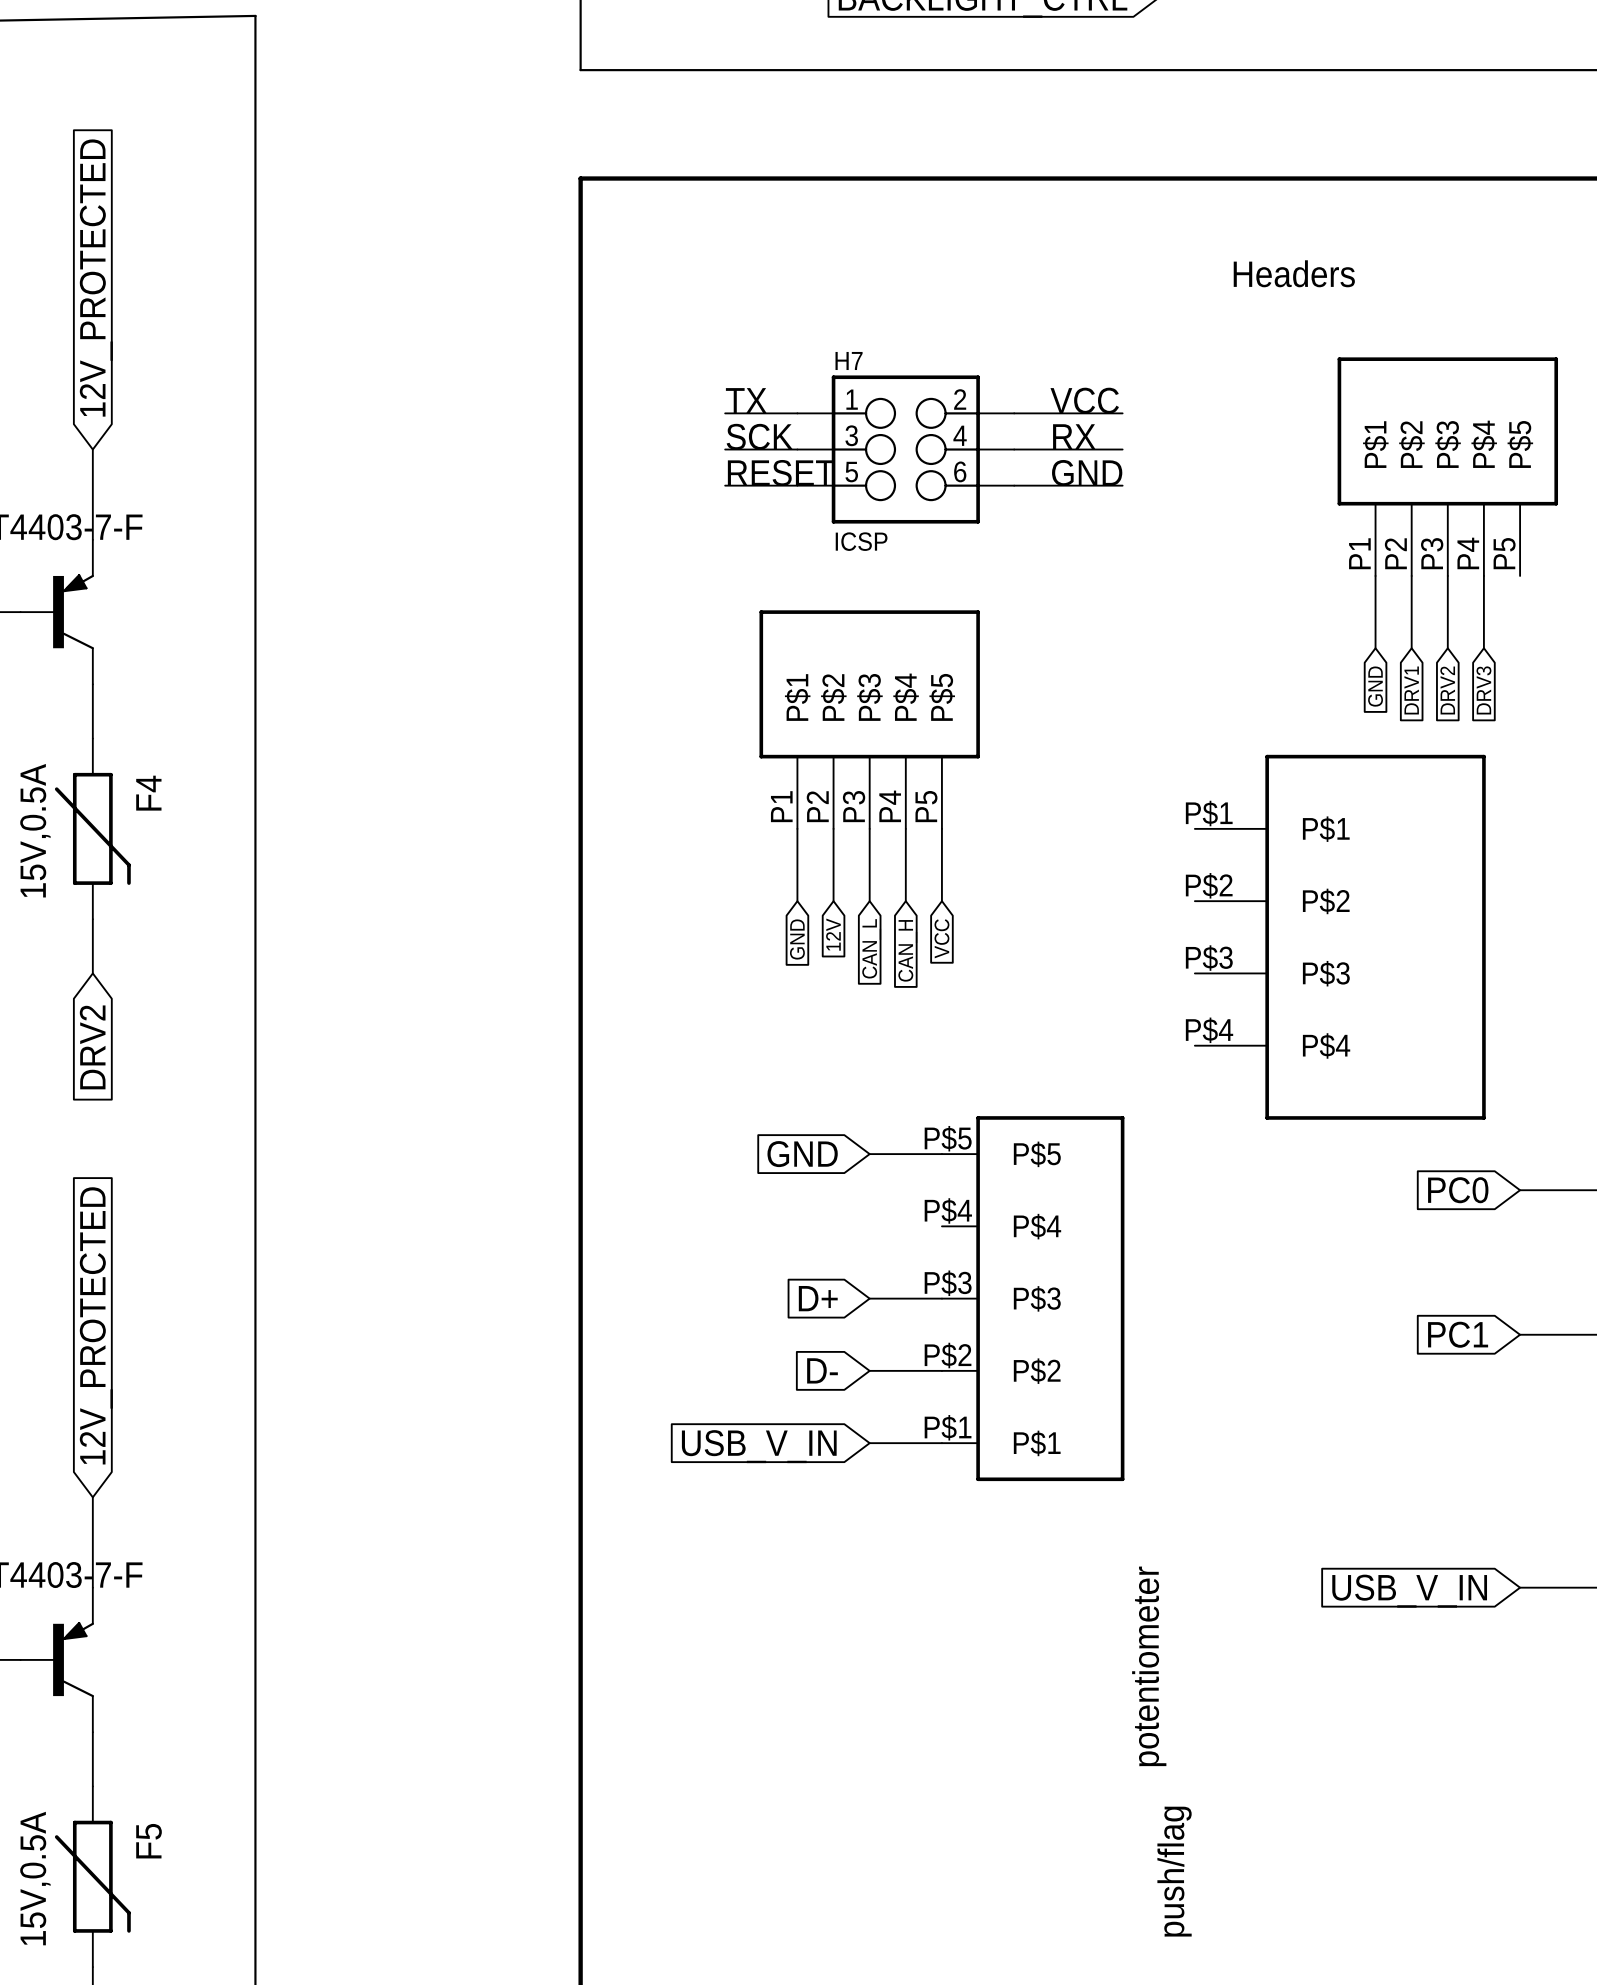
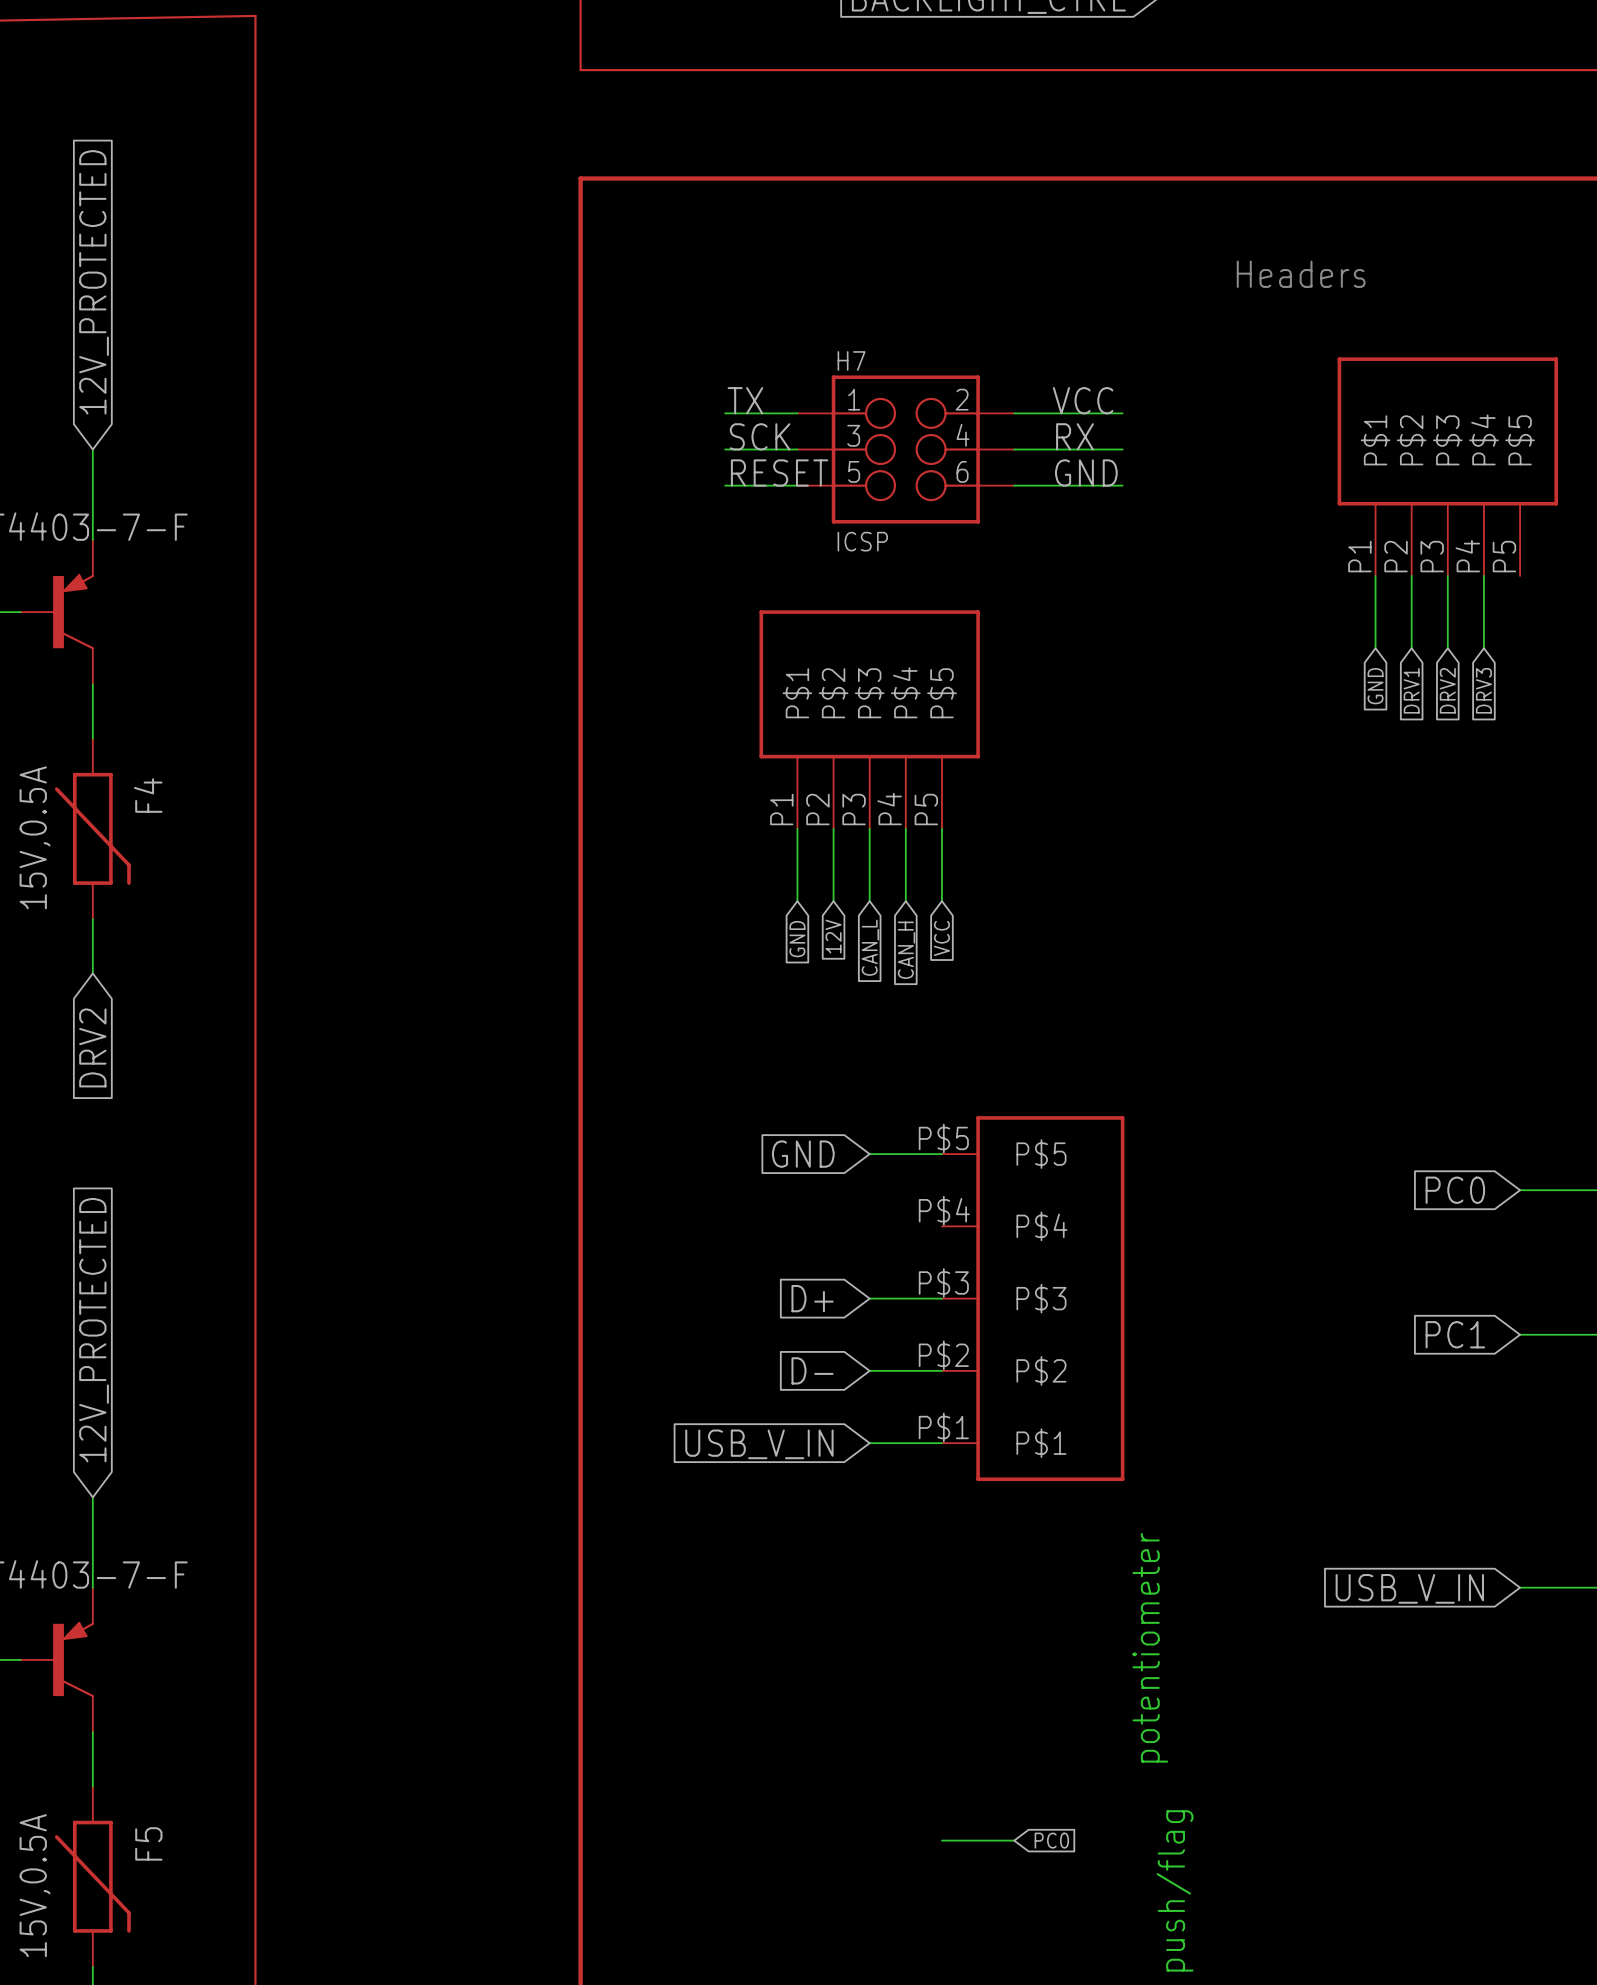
part: (1340, 937) -> none
wire: none -> (941, 1840) (1014, 1840)
global label: none -> PC0 (1051, 1840)

